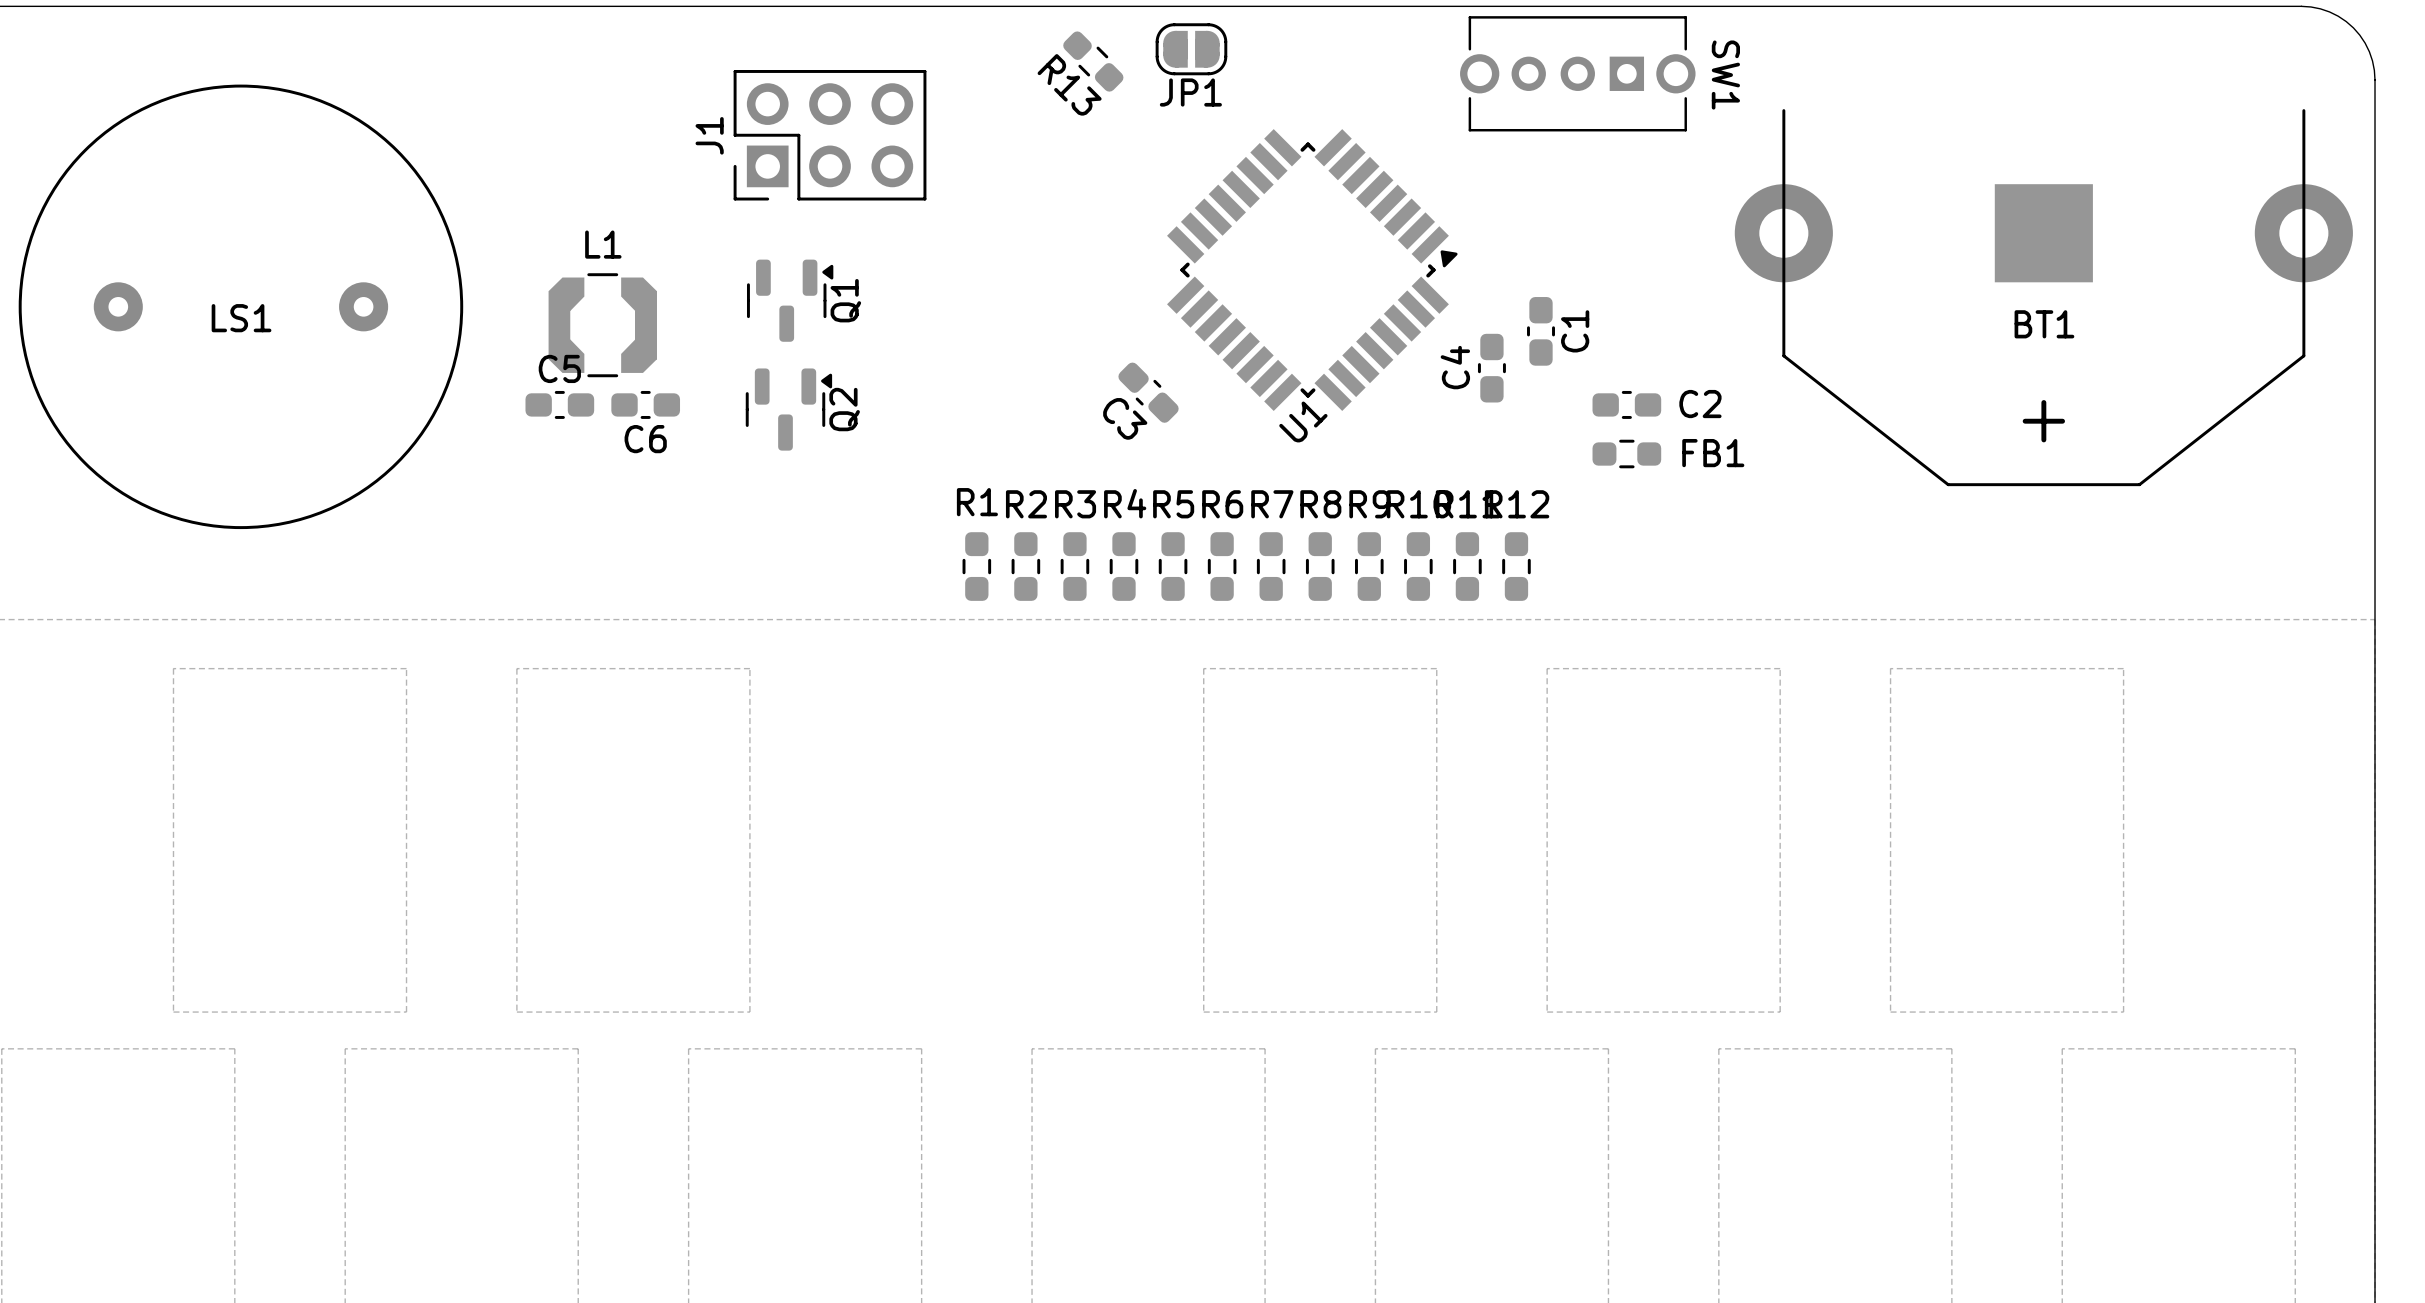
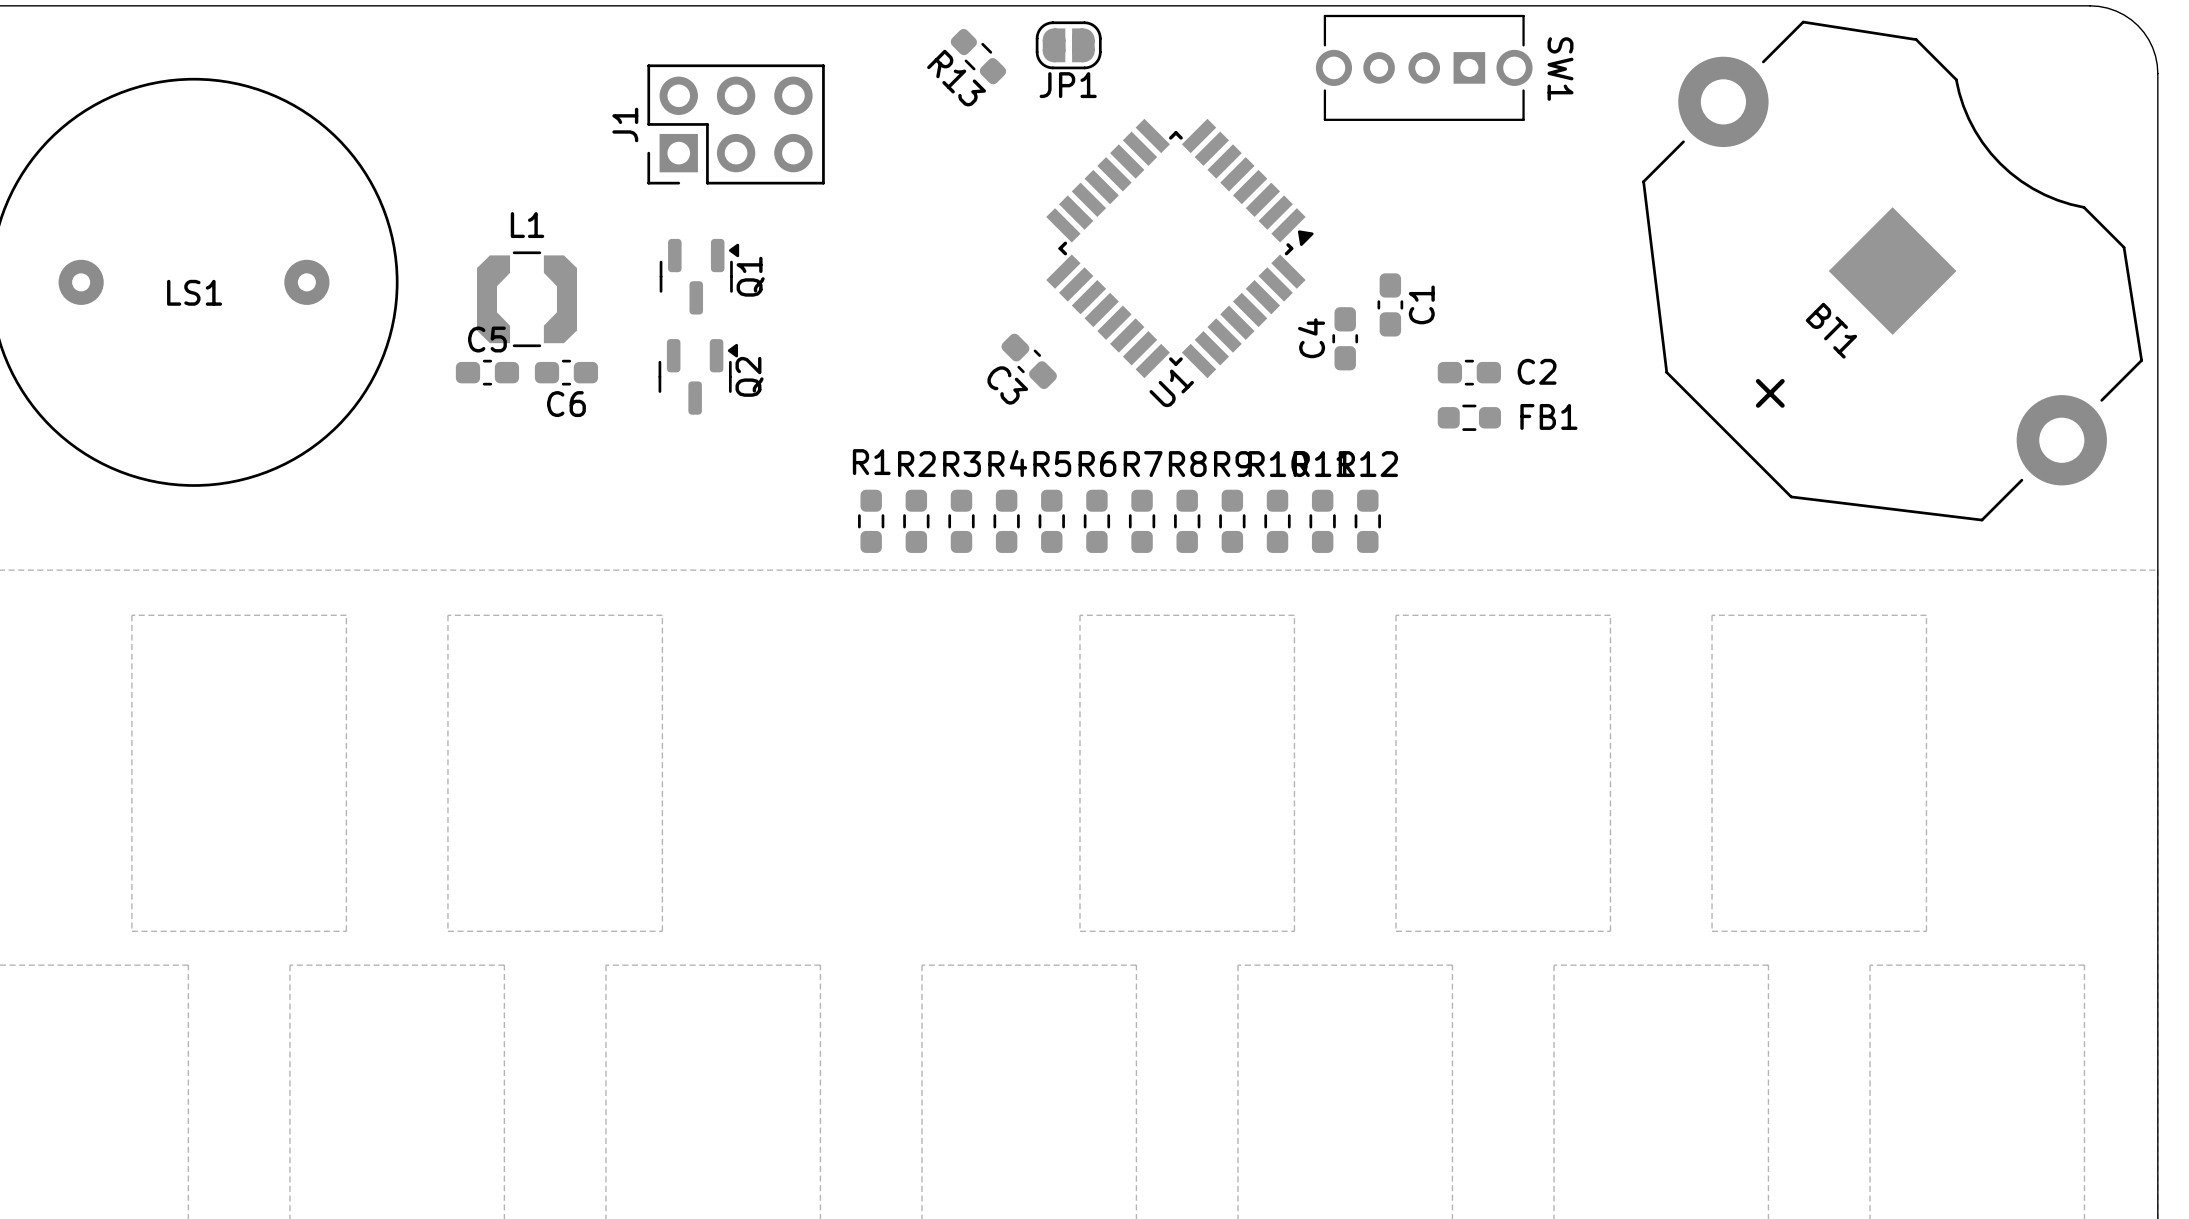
BT1 footprint: [1734, 109, 2353, 487] -> [1642, 20, 2143, 522]
BT1 name position: BT1 (2044, 324) -> BT1 (1831, 330)

